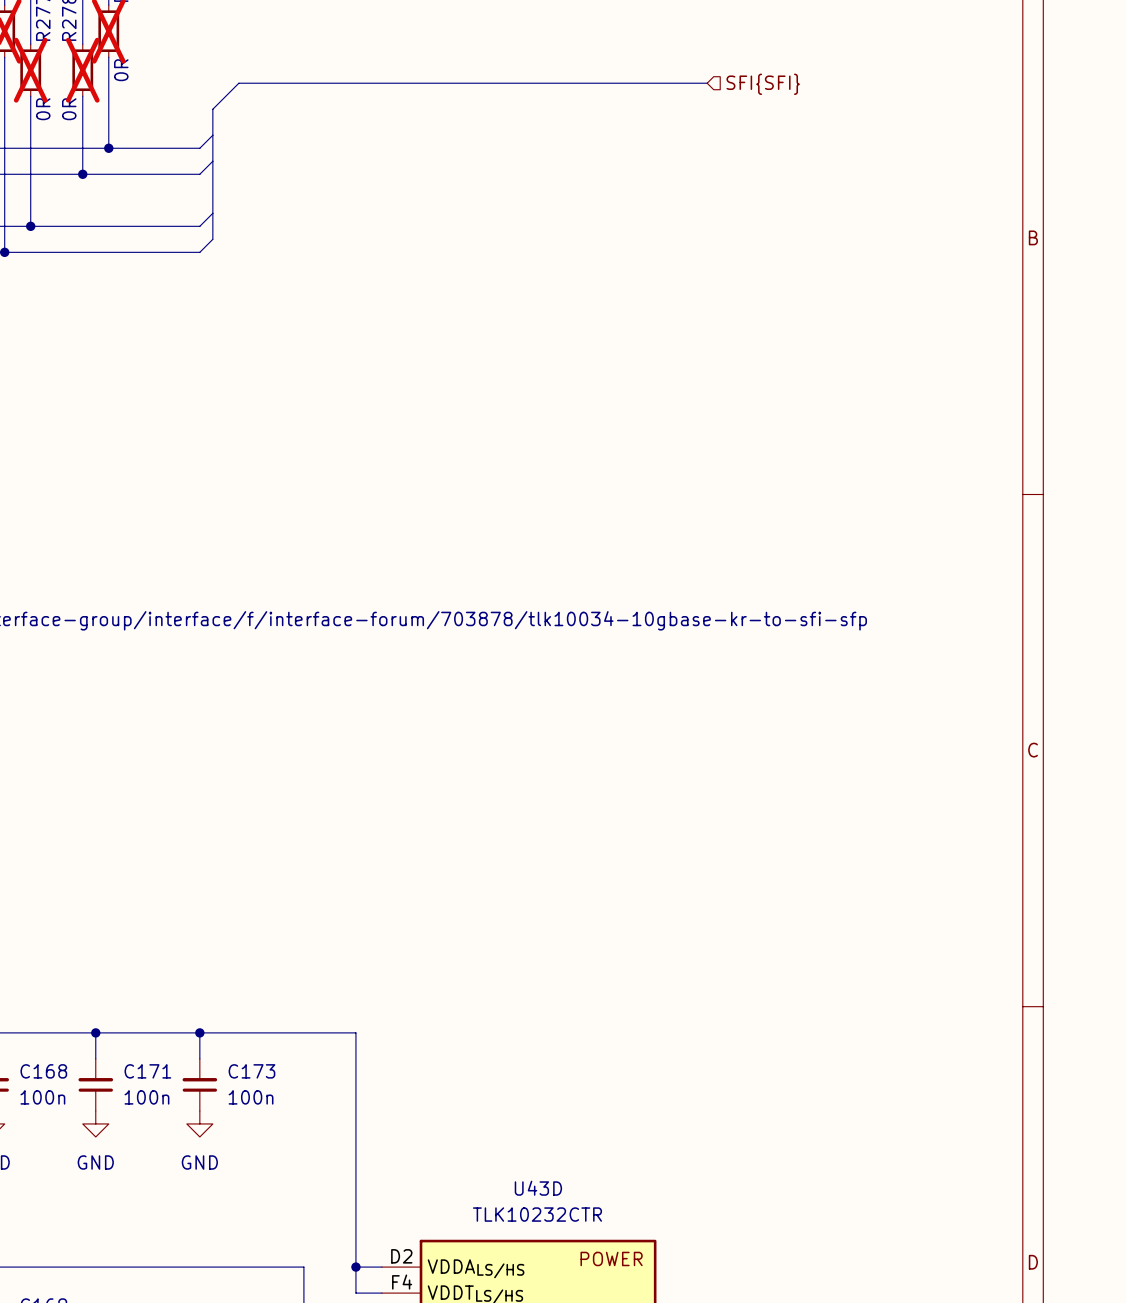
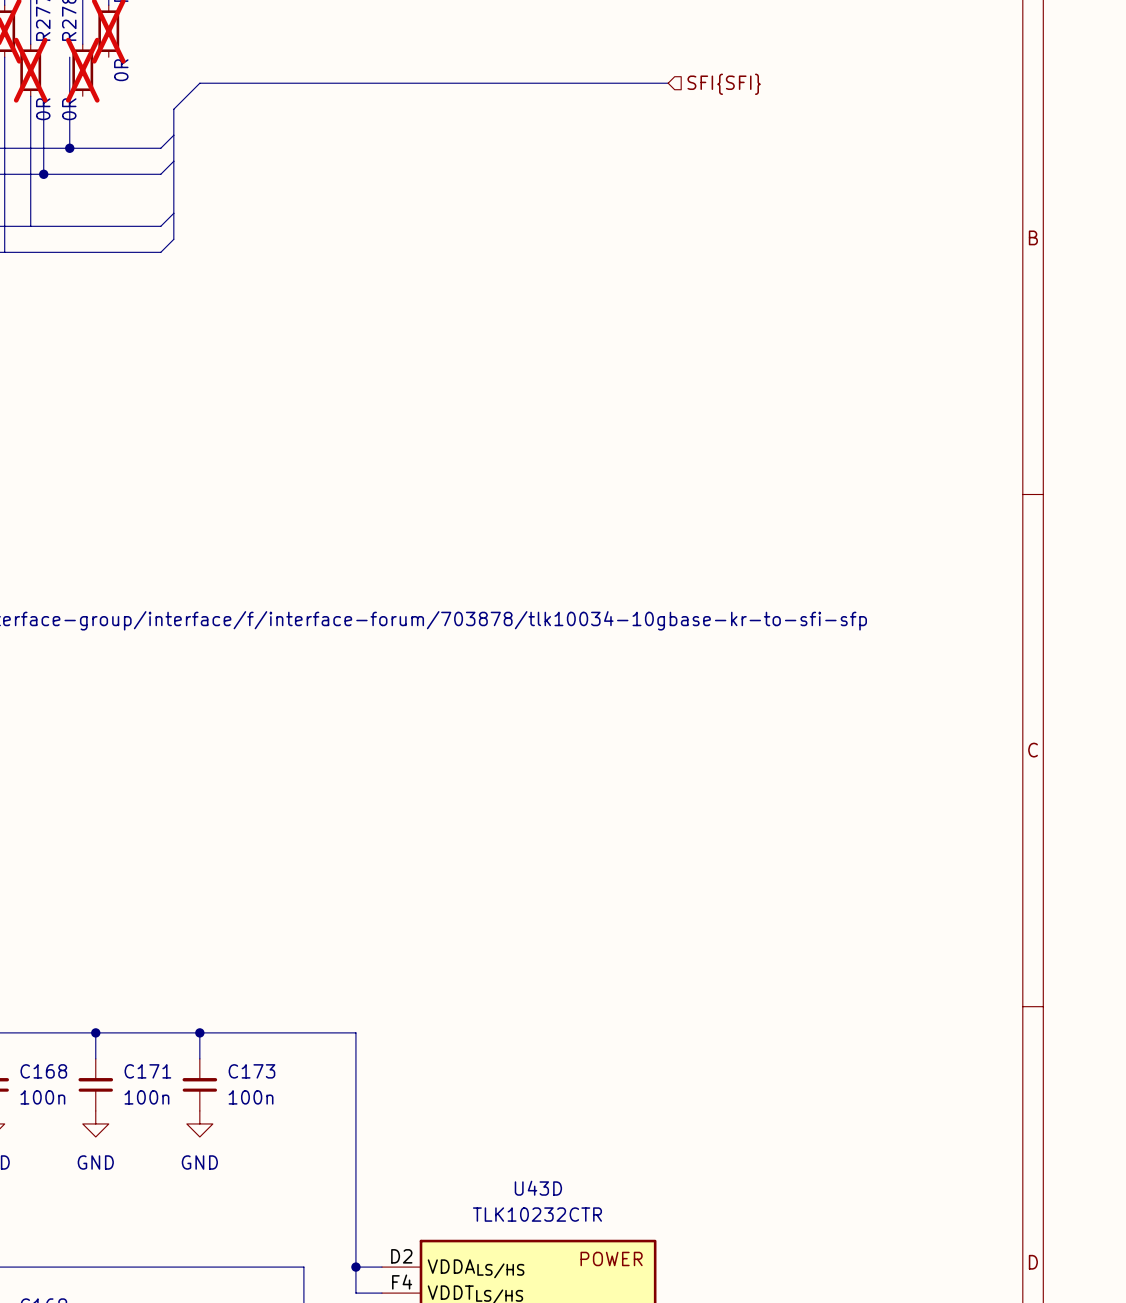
wire: (108, 57) (108, 148) -> (69, 57) (69, 148)
bus: (238, 83) (212, 109) (212, 239) -> (238, 83) (199, 83) (173, 109) (173, 239)
bus: (668, 83) (707, 83) -> none
hierarchical label position: SFI{SFI} (763, 84) -> SFI{SFI} (724, 84)
wire: (82, 96) (82, 174) -> (43, 96) (43, 174)
wire: (212, 135) (199, 148) (160, 148) -> (173, 135) (160, 148)
junction: none -> (69, 148)
junction: (108, 148) -> none
wire: (212, 161) (199, 174) (160, 174) -> (173, 161) (160, 174)
junction: none -> (43, 174)
junction: (82, 174) -> none
wire: (212, 213) (199, 226) (160, 226) -> (173, 213) (160, 226)
junction: (30, 226) -> none
wire: (212, 239) (199, 252) (160, 252) -> (173, 239) (160, 252)
junction: (4, 252) -> none

